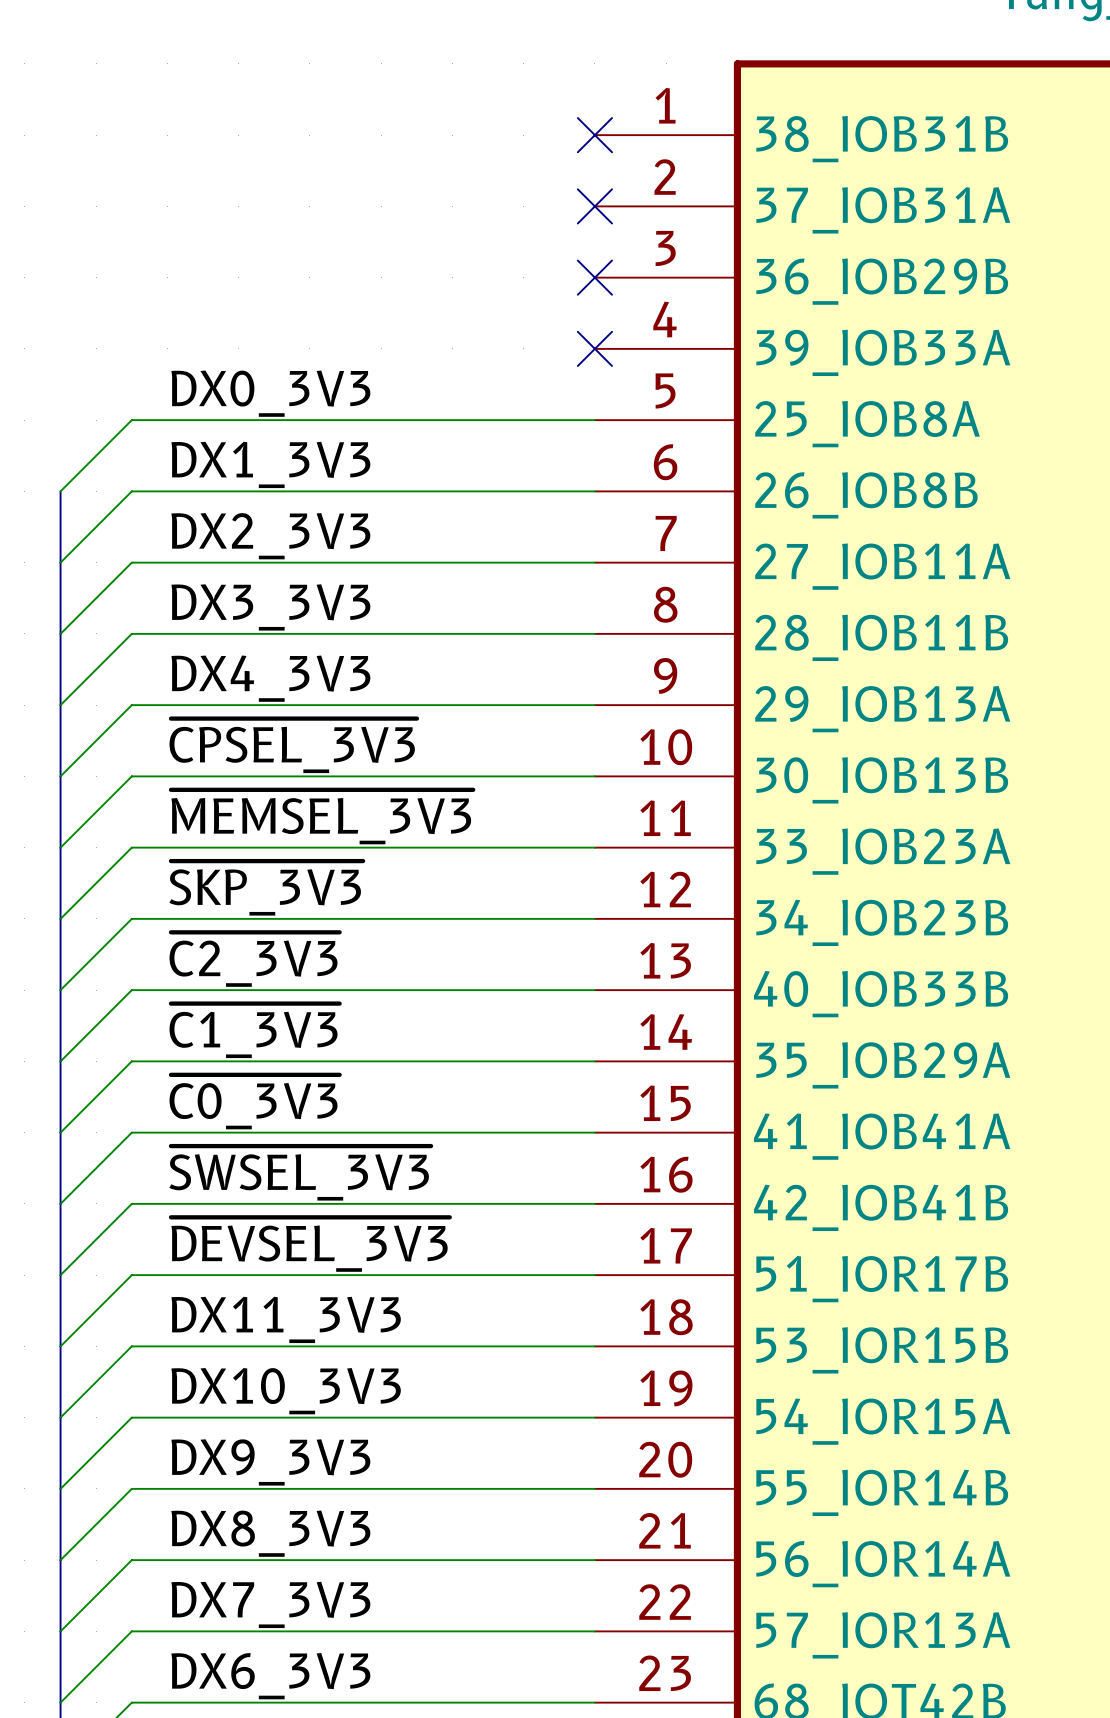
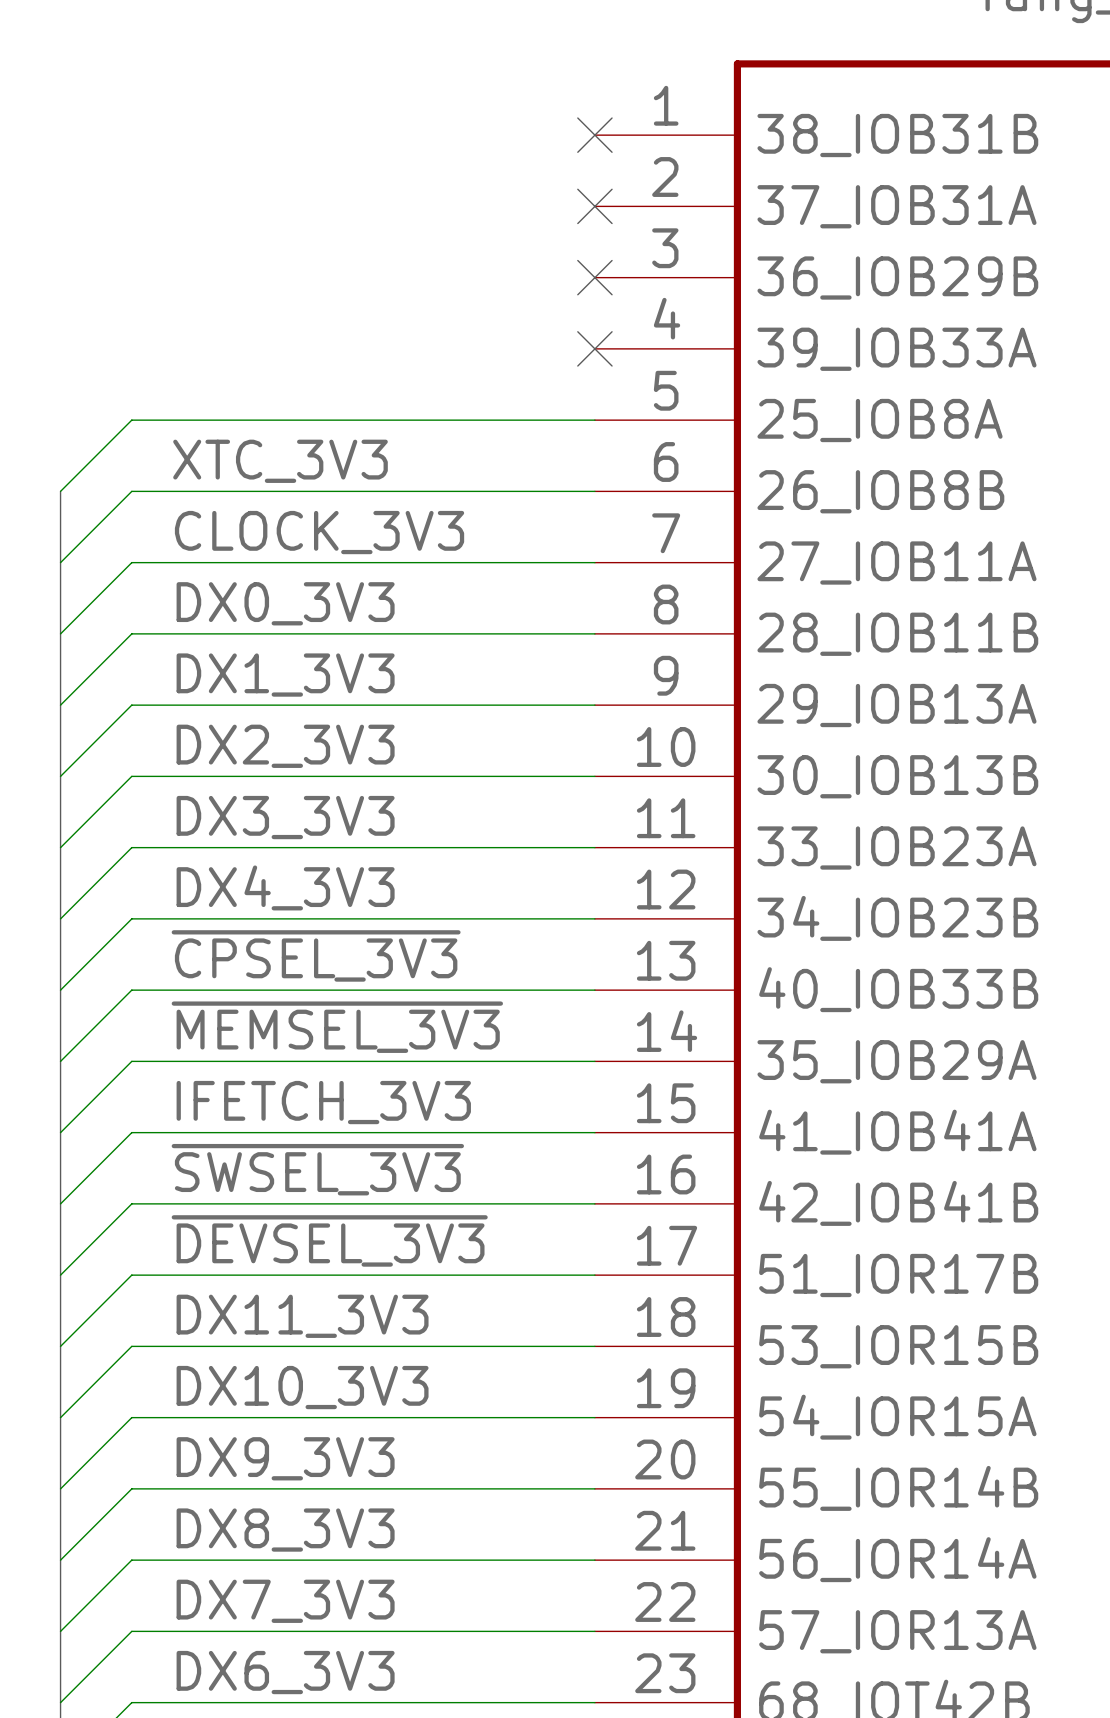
label: DX0_3V3 (270, 393) -> none
label: DX1_3V3 (270, 464) -> XTC_3V3 (280, 461)
label: DX2_3V3 (270, 536) -> CLOCK_3V3 (319, 532)
label: DX3_3V3 (270, 607) -> DX0_3V3 (285, 603)
label: DX4_3V3 (270, 678) -> DX1_3V3 (285, 675)
label: ~{CPSEL_3V3} (293, 745) -> DX2_3V3 (285, 746)
label: ~{MEMSEL_3V3} (322, 817) -> DX3_3V3 (285, 817)
label: ~{SKP_3V3} (266, 888) -> DX4_3V3 (285, 887)
label: ~{C2_3V3} (254, 959) -> ~{CPSEL_3V3} (316, 955)
label: ~{C1_3V3} (254, 1030) -> ~{MEMSEL_3V3} (337, 1027)
label: ~{C0_3V3} (254, 1102) -> IFETCH_3V3 (323, 1102)

